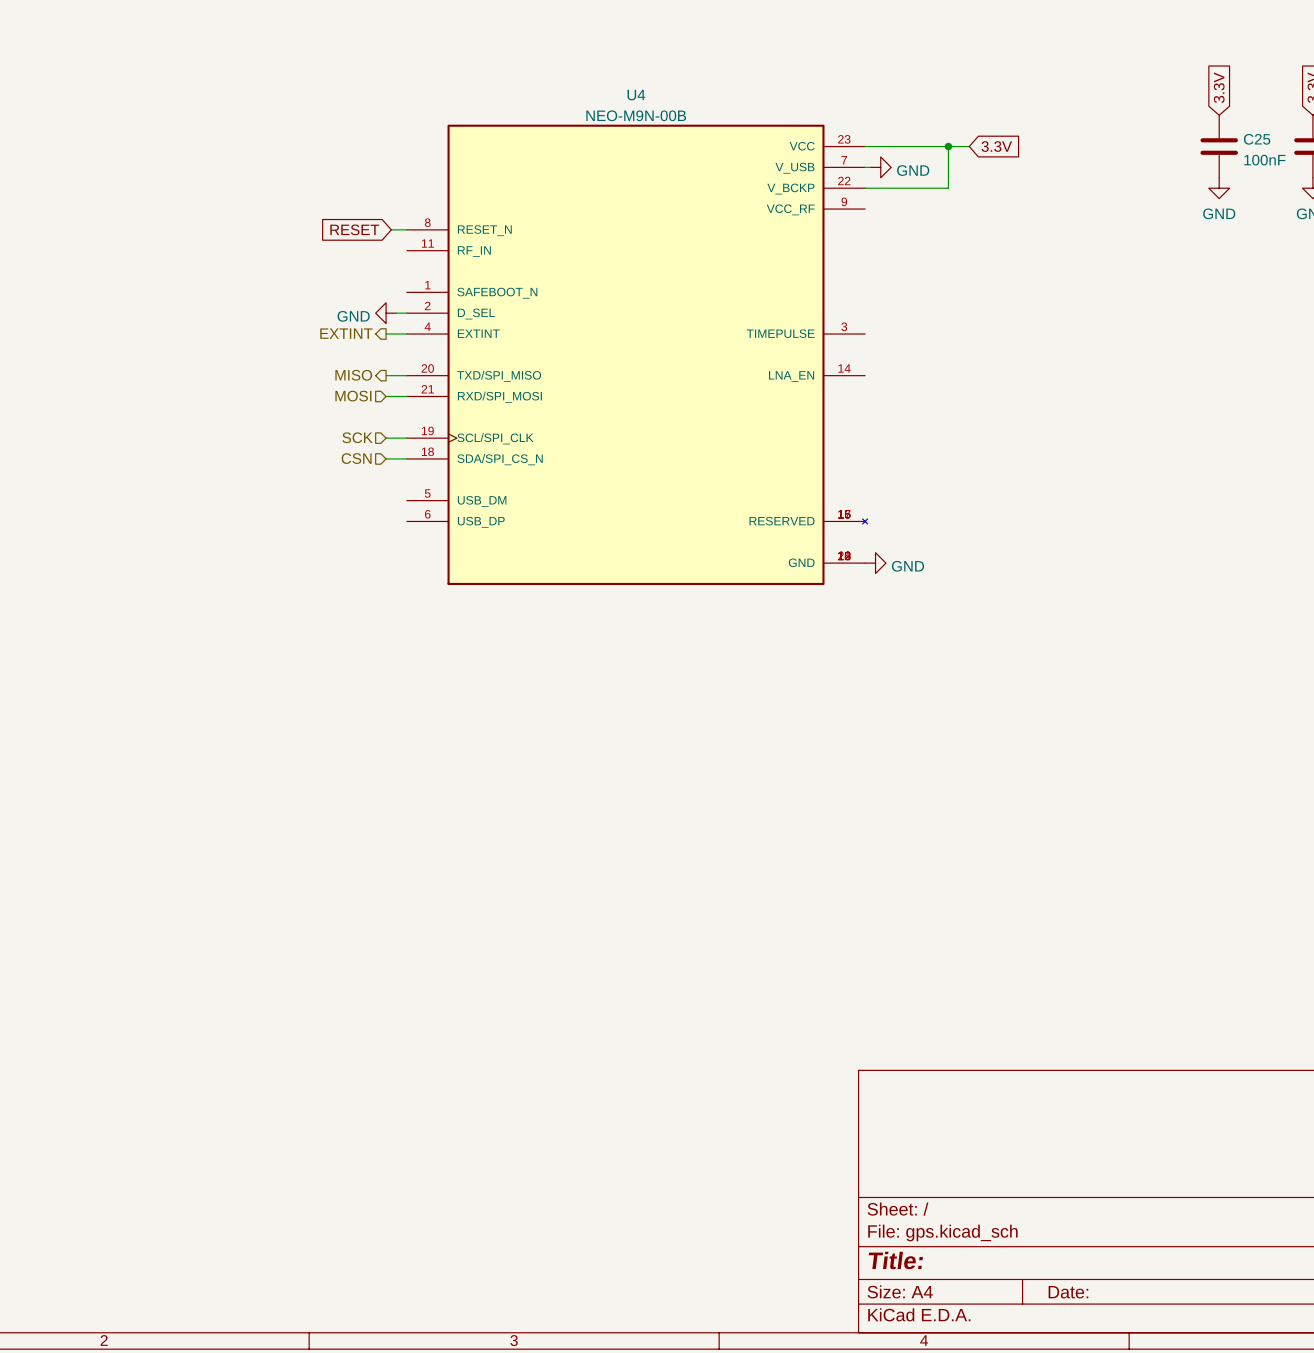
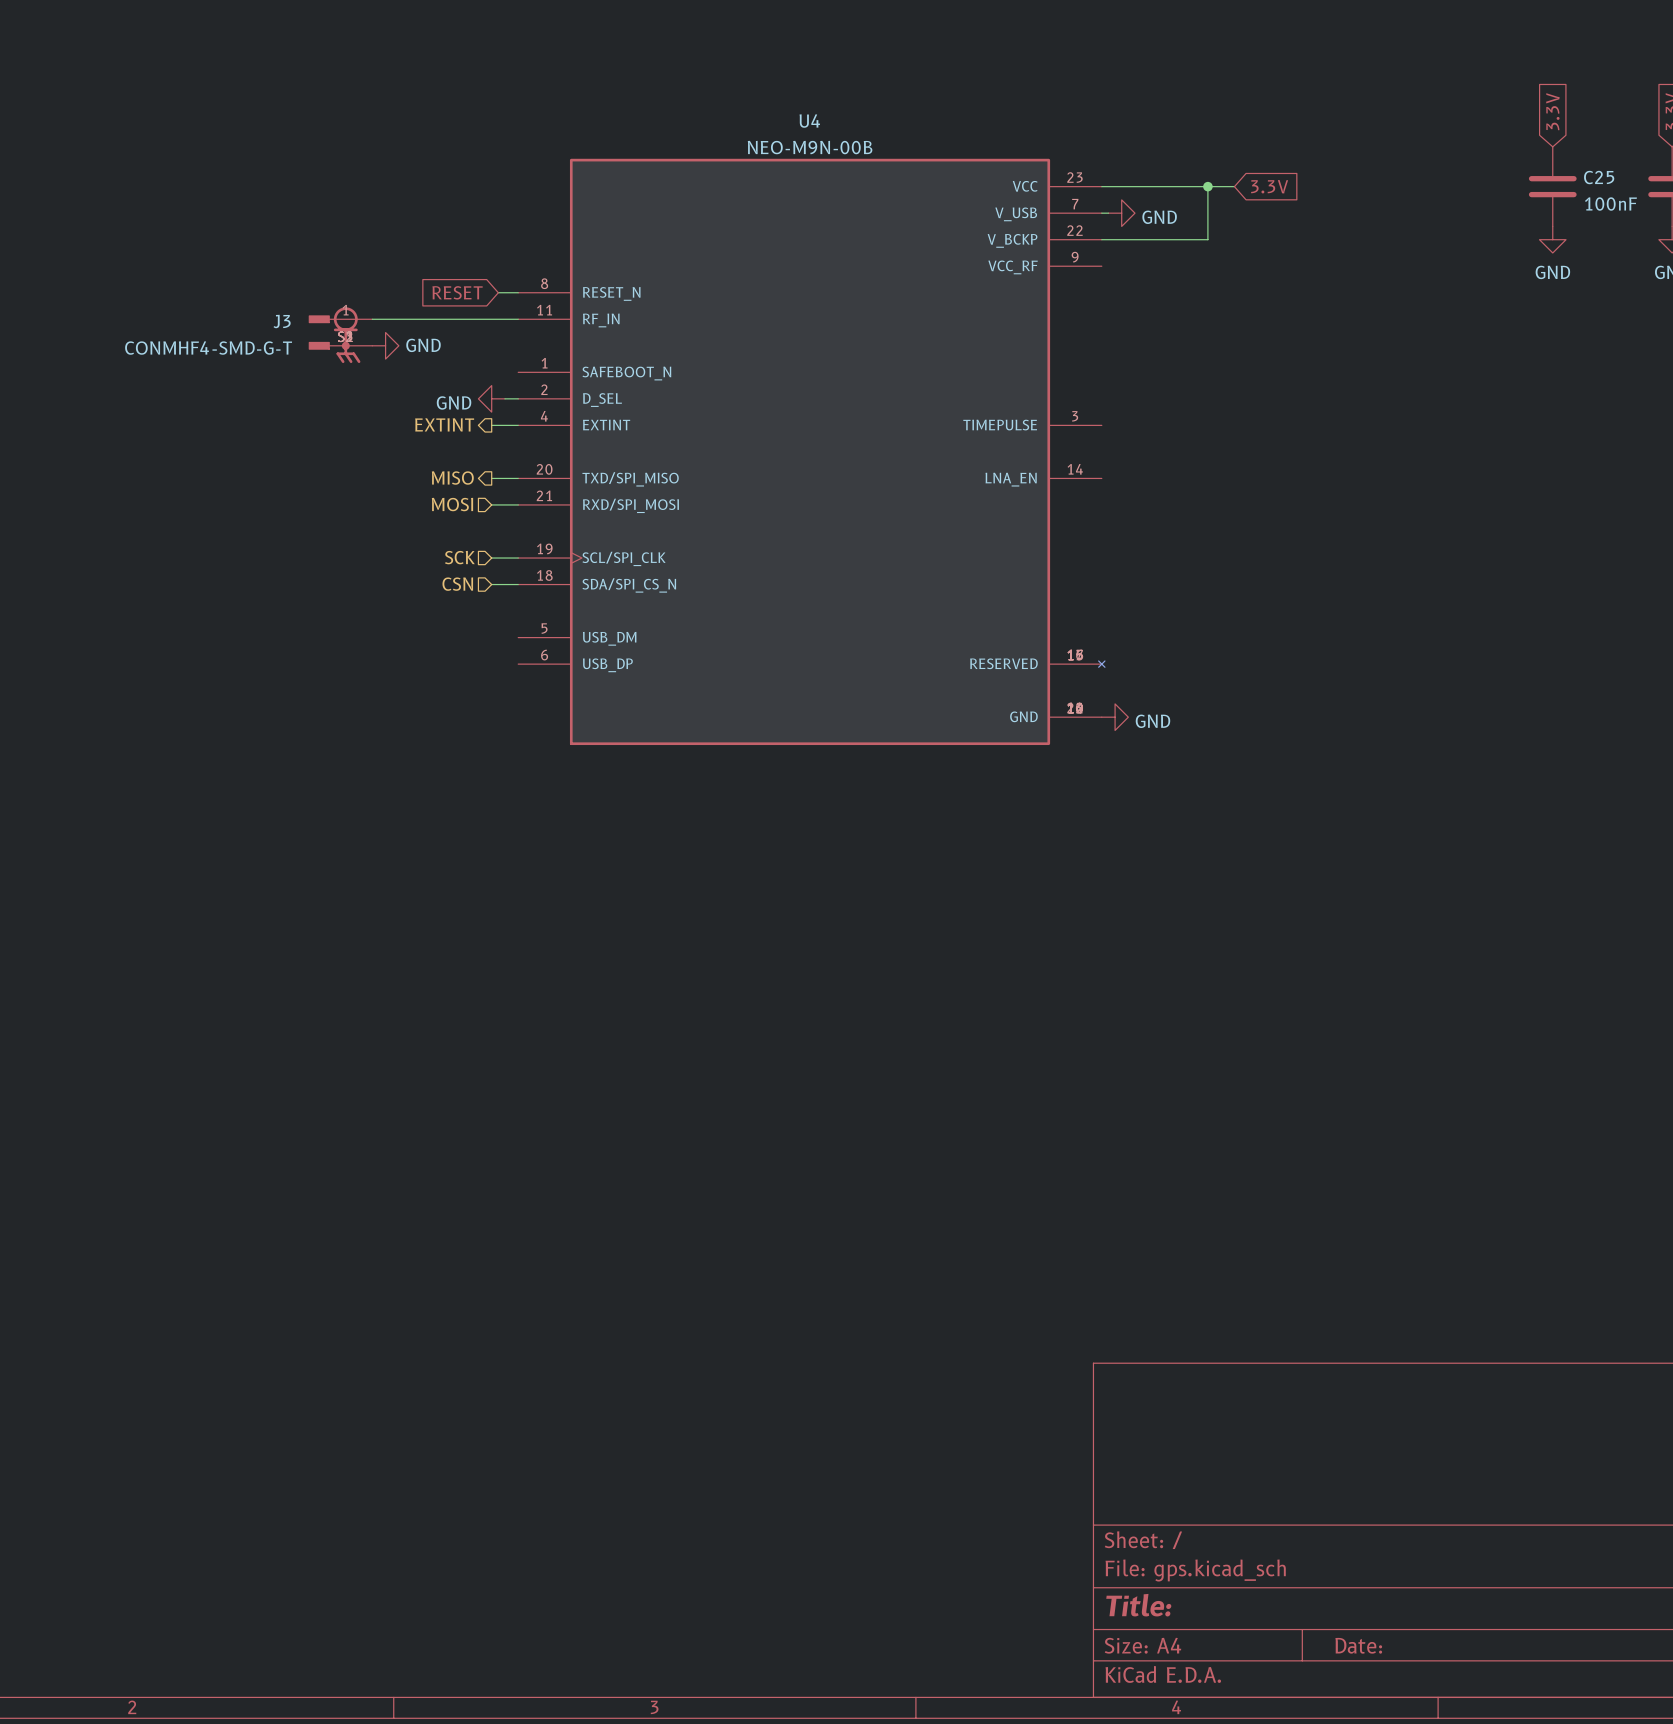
wire: none -> (372, 319) (518, 319)
J3: none -> CONMHF4-SMD-G-T (340, 335)
power symbol: none -> GND (385, 345)

